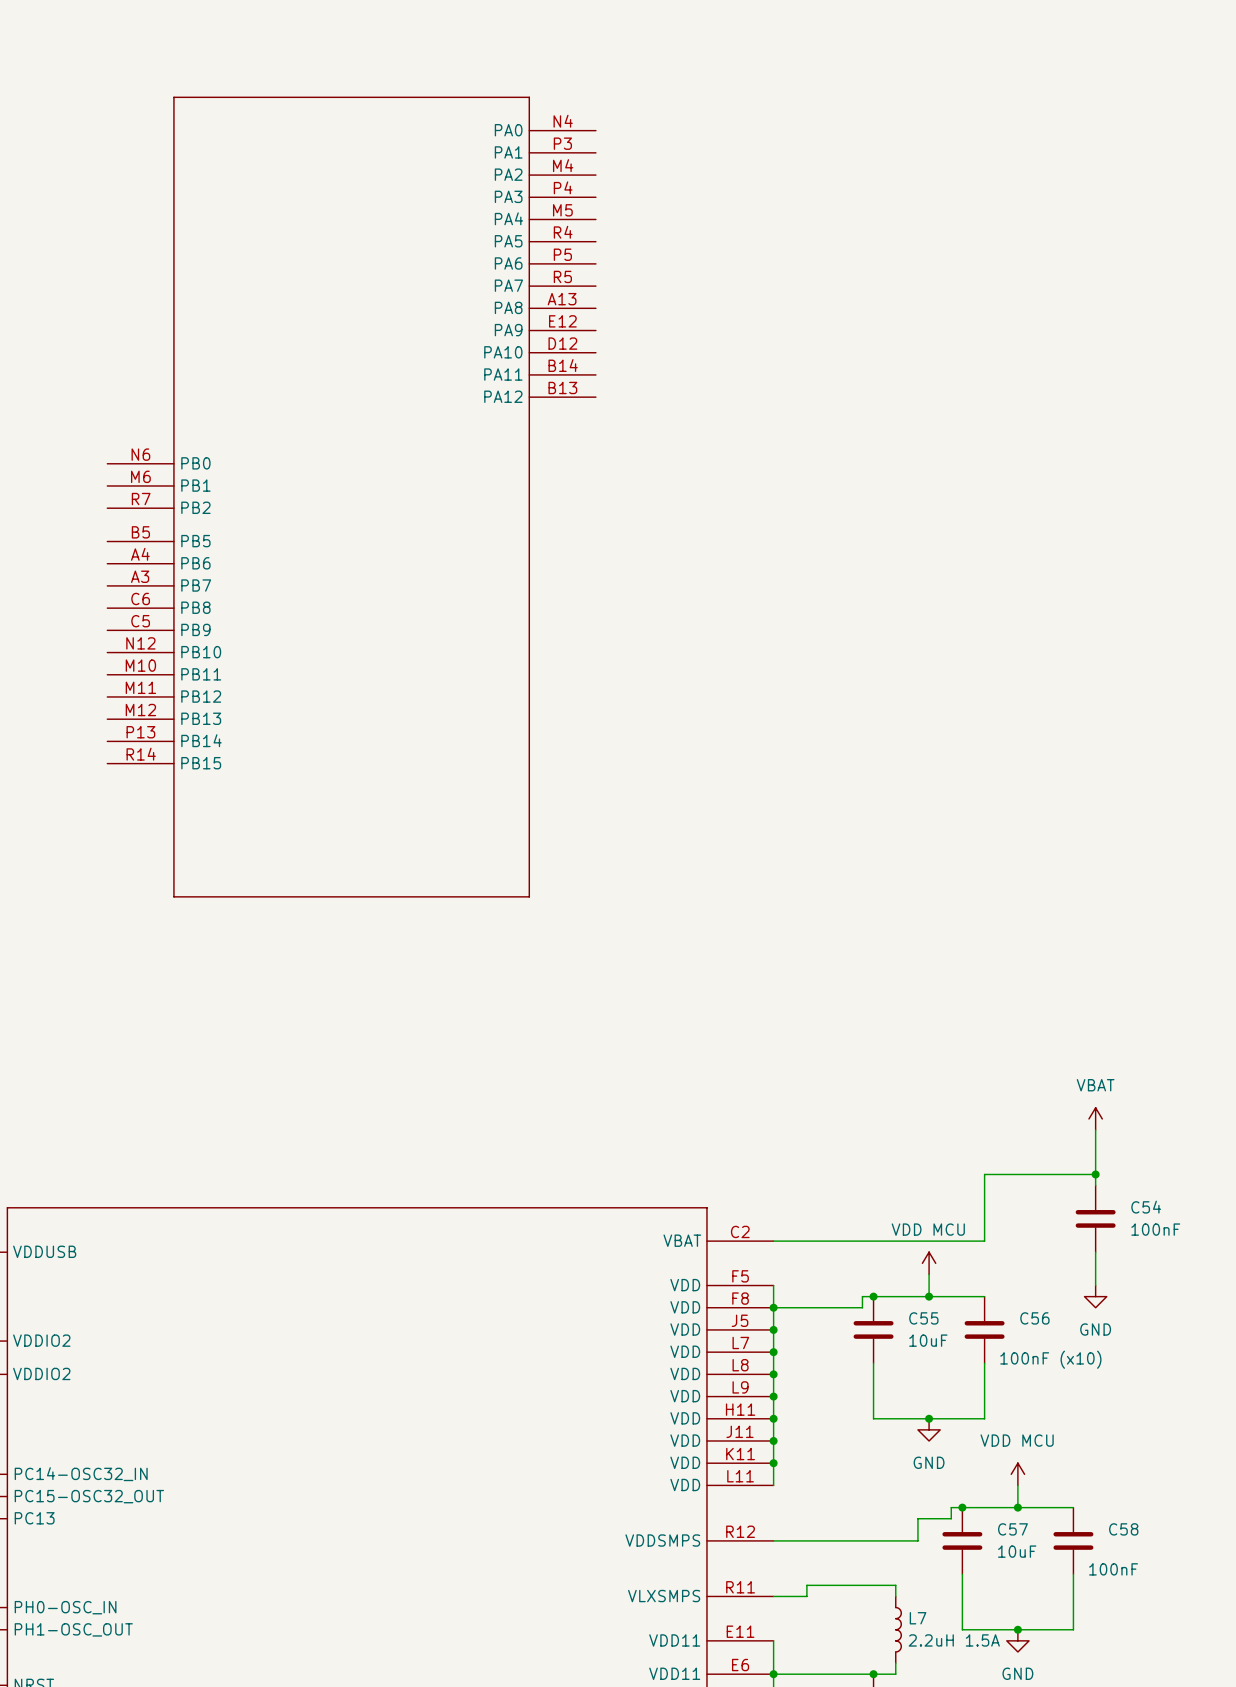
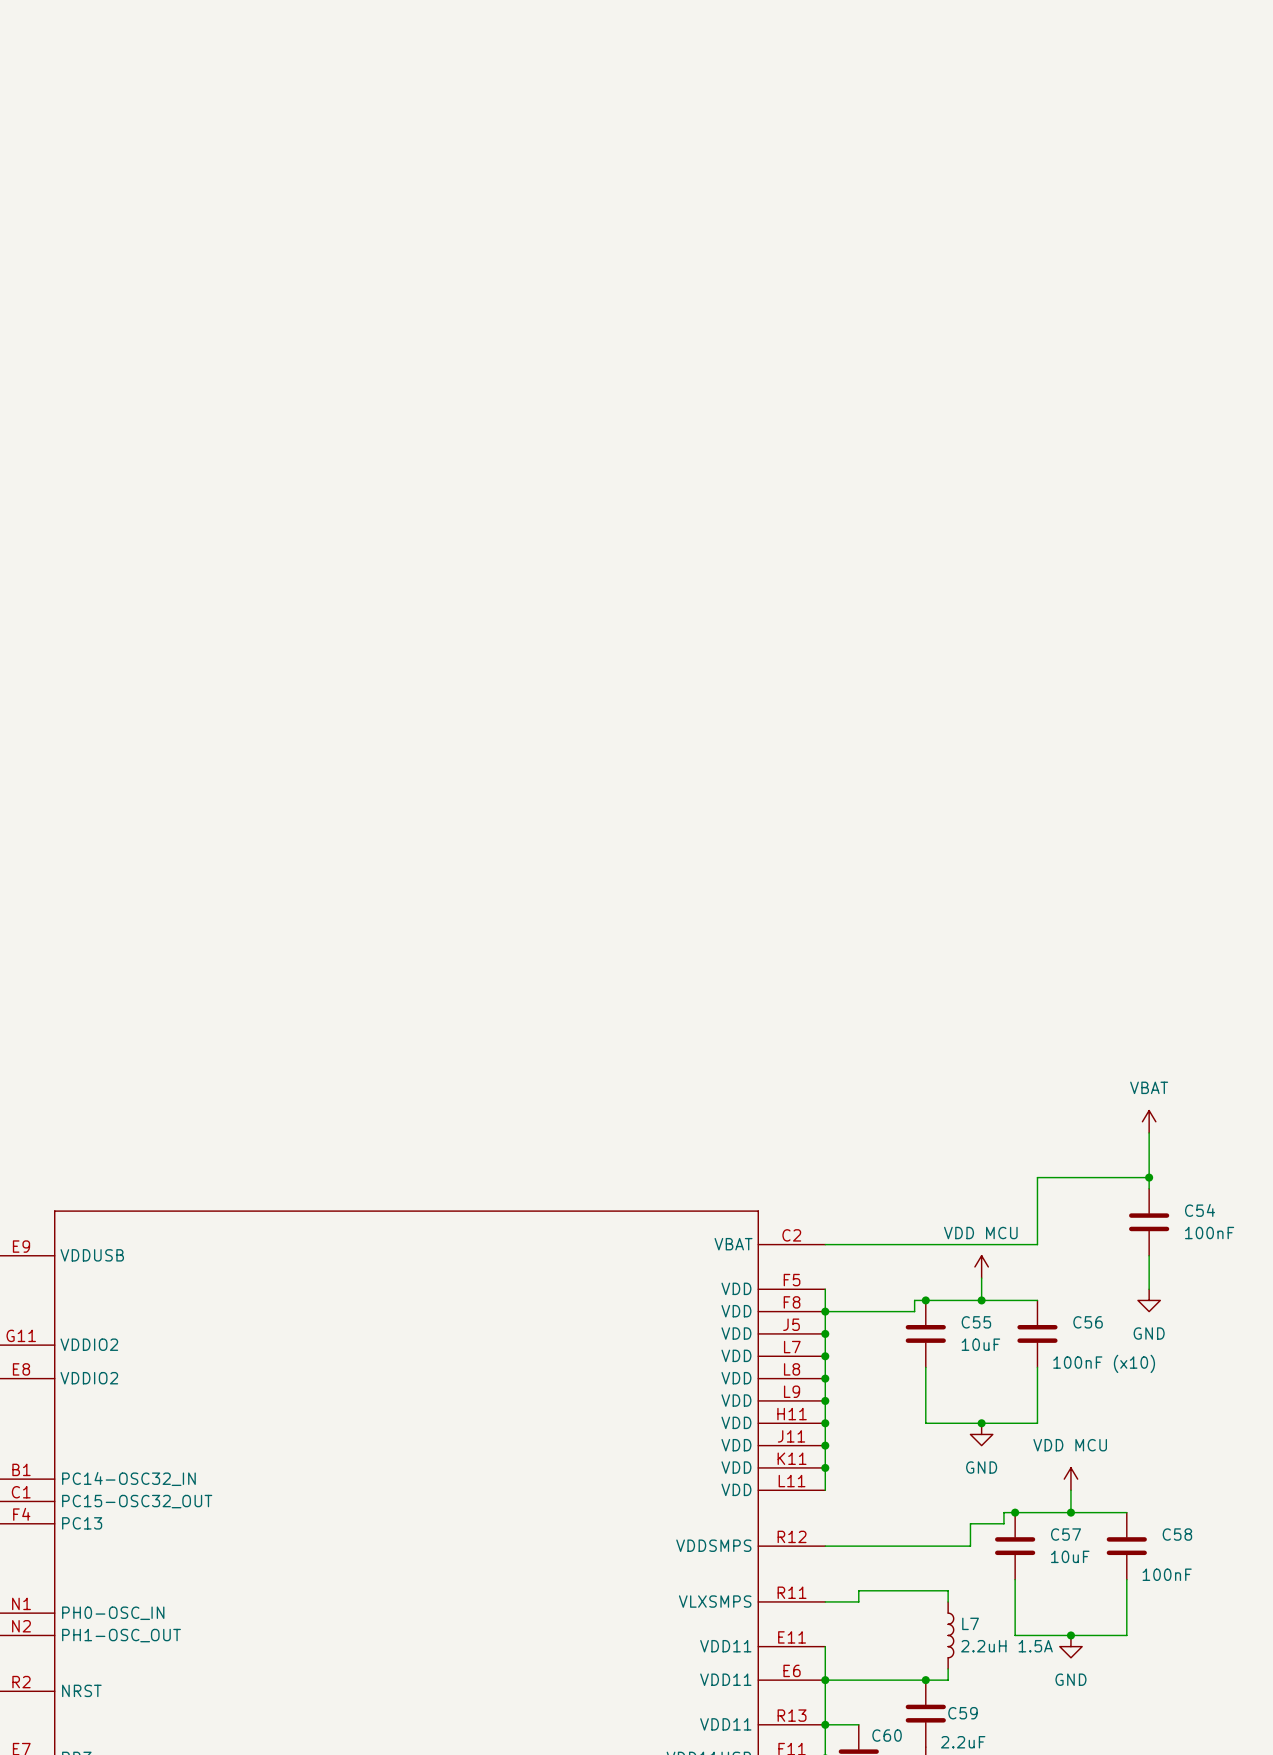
part: (351, 497) -> none

